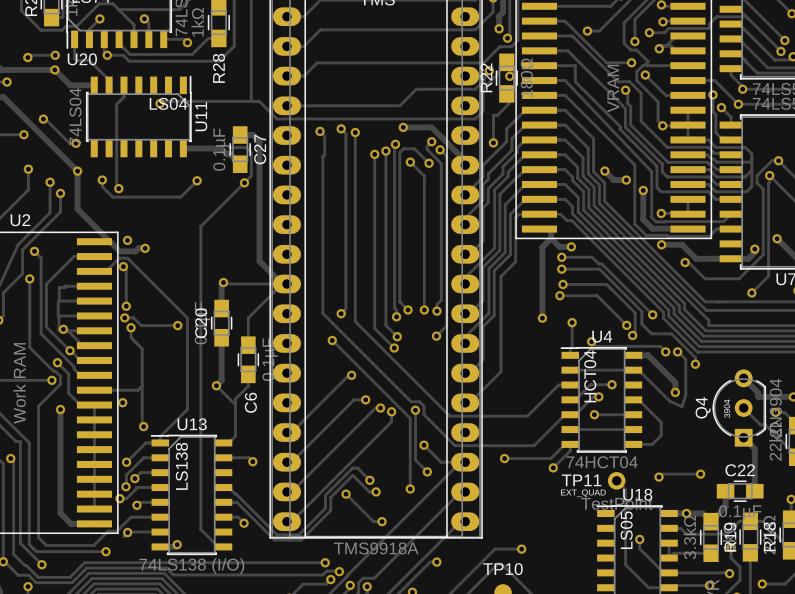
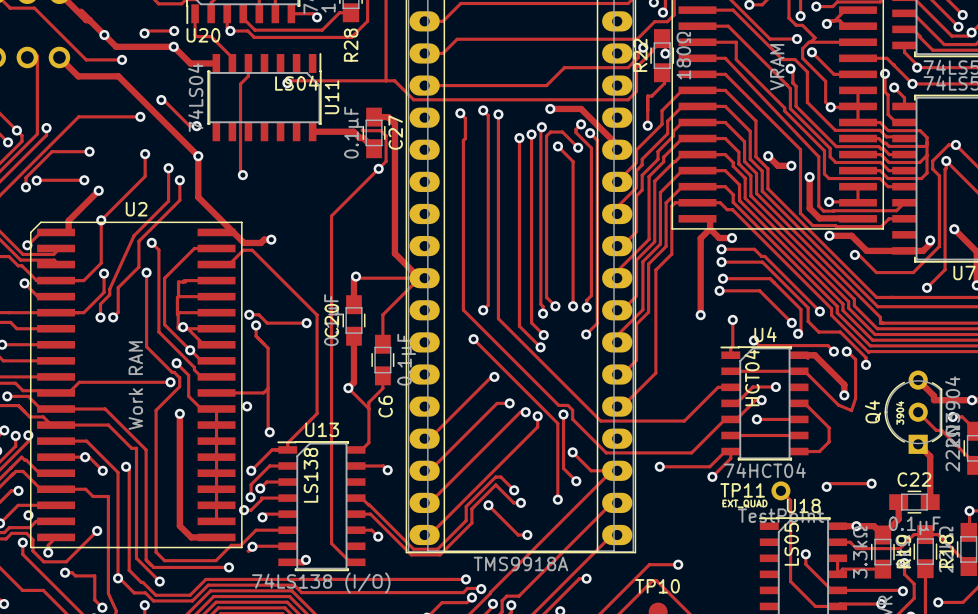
track: (102, 180) (102, 186) (112, 197) (180, 197) (197, 180) -> none
via: (102, 180) -> none
via: (197, 180) -> none
via: (127, 240) -> none
track: (123, 266) (126, 269) (126, 306) -> none
via: (123, 266) -> none
via: (126, 306) -> none

